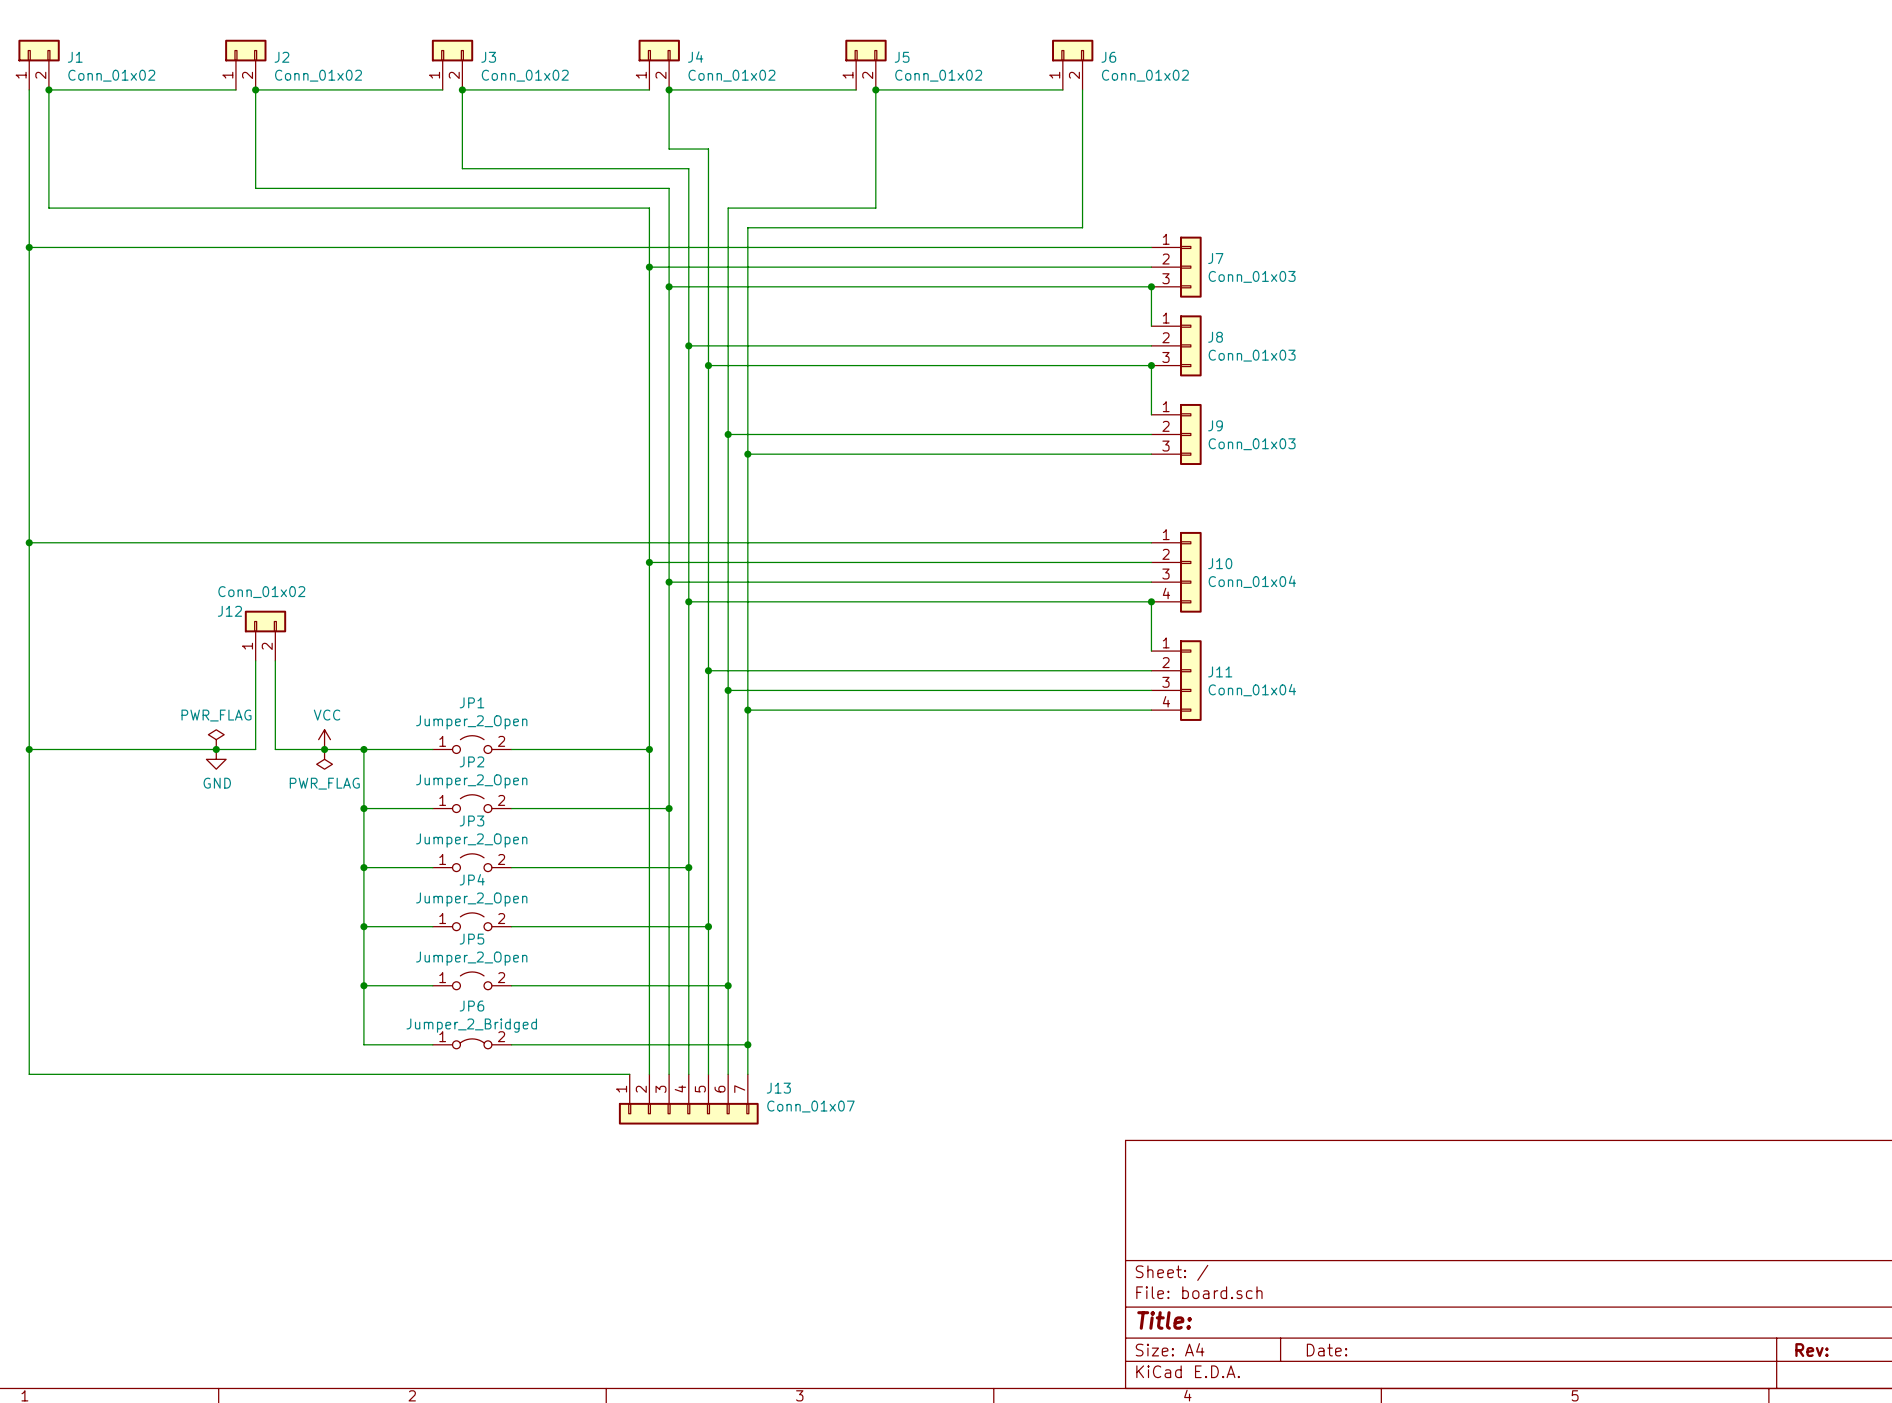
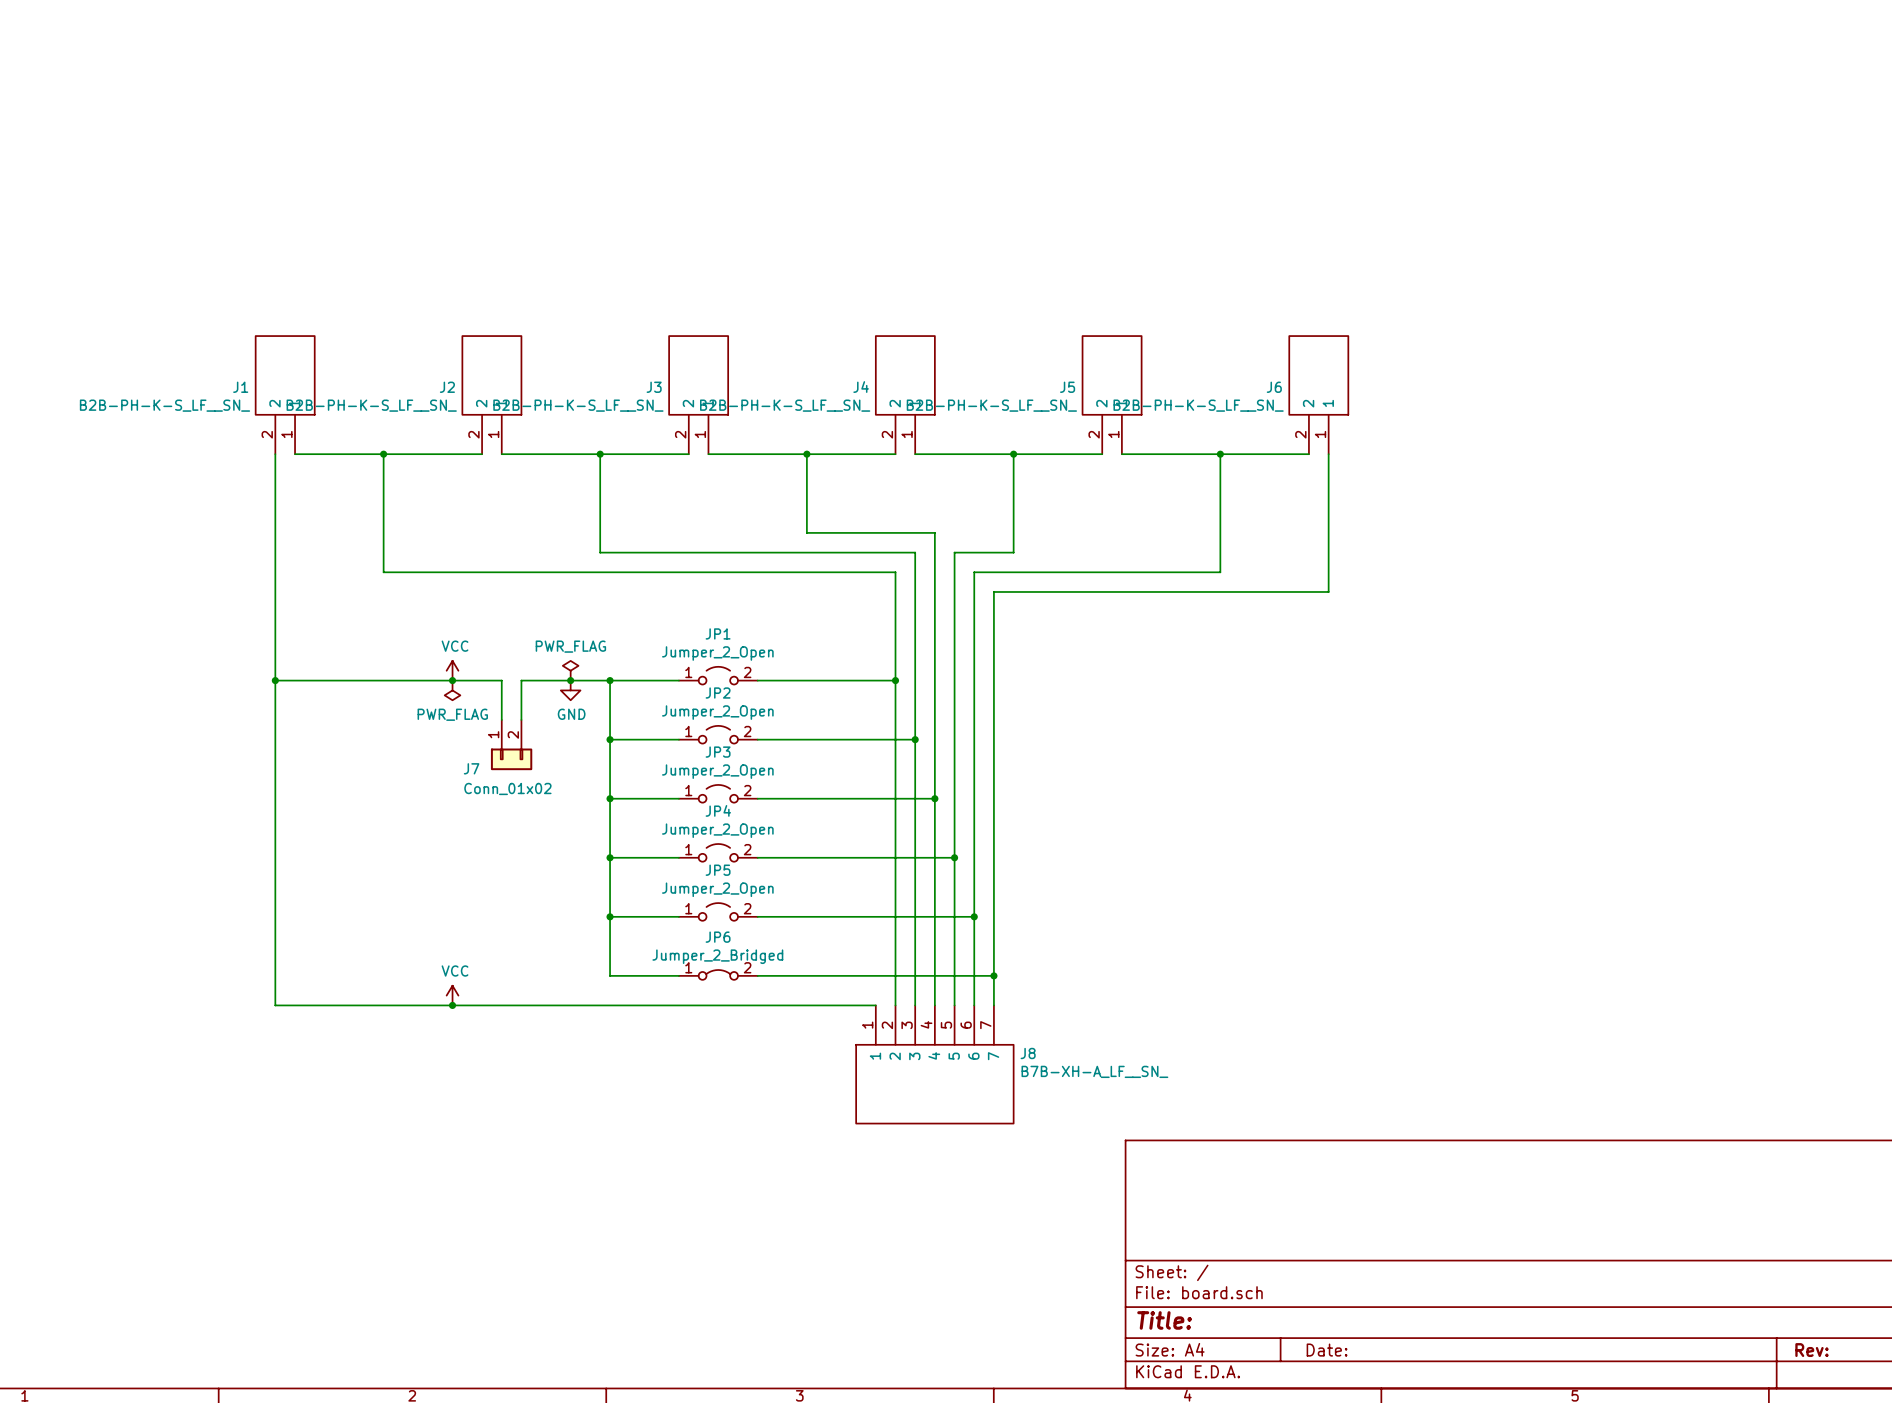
J1 symbol: [18, 39, 60, 90] -> [255, 335, 316, 455]
J2 symbol: [225, 39, 267, 90] -> [461, 335, 523, 455]
J3 symbol: [431, 39, 474, 90] -> [668, 335, 729, 455]
J4 symbol: [638, 39, 680, 90] -> [875, 335, 936, 455]
J5 symbol: [845, 39, 887, 90] -> [1081, 335, 1143, 455]
J6 symbol: [1052, 39, 1094, 90] -> [1288, 335, 1349, 455]
J1 name position: J1 (75, 57) -> J1 (240, 387)
J2 name position: J2 (281, 57) -> J2 (447, 387)
J3 name position: J3 (488, 57) -> J3 (654, 387)
J4 name position: J4 (695, 57) -> J4 (861, 387)
J5 name position: J5 (902, 57) -> J5 (1067, 387)
J6 name position: J6 (1108, 57) -> J6 (1274, 387)
J1 value: Conn_01x02 (111, 75) -> B2B-PH-K-S_LF__SN_ (164, 405)
J2 value: Conn_01x02 (318, 75) -> B2B-PH-K-S_LF__SN_ (371, 405)
J3 value: Conn_01x02 (525, 75) -> B2B-PH-K-S_LF__SN_ (578, 405)
J4 value: Conn_01x02 (731, 75) -> B2B-PH-K-S_LF__SN_ (785, 405)
J5 value: Conn_01x02 (938, 75) -> B2B-PH-K-S_LF__SN_ (991, 405)
J6 value: Conn_01x02 (1145, 75) -> B2B-PH-K-S_LF__SN_ (1198, 405)
wire: (29, 89) (29, 1074) (629, 1074) -> none
junction: (48, 89) -> none
wire: (235, 89) (48, 89) (48, 208) (649, 208) (649, 1074) -> none
junction: (255, 89) -> none
wire: (442, 89) (255, 89) (255, 188) (669, 188) (669, 1074) -> none
junction: (462, 89) -> none
wire: (649, 89) (462, 89) (462, 168) (688, 168) (688, 1074) -> none
junction: (669, 89) -> none
wire: (856, 89) (669, 89) (669, 149) (708, 149) (708, 1074) -> none
junction: (875, 89) -> none
wire: (1062, 89) (875, 89) (875, 208) (728, 208) (728, 1074) -> none
wire: (1082, 89) (1082, 227) (747, 227) (747, 1074) -> none
J7 symbol: [1151, 236, 1202, 298] -> [490, 719, 533, 771]
wire: (29, 247) (1151, 247) -> none
junction: (29, 247) -> none
J7 name position: J7 (1215, 258) -> J7 (471, 768)
wire: (649, 267) (1151, 267) -> none
junction: (649, 267) -> none
J7 value: Conn_01x03 (1252, 276) -> Conn_01x02 (507, 788)
wire: (669, 286) (1151, 286) (1151, 326) -> none
junction: (669, 286) -> none
junction: (1151, 286) -> none
J8 symbol: [1151, 315, 1202, 377] -> [855, 1005, 1015, 1125]
J8 name position: J8 (1215, 337) -> J8 (1028, 1053)
wire: (688, 345) (1151, 345) -> none
junction: (688, 345) -> none
J8 value: Conn_01x03 (1252, 355) -> B7B-XH-A_LF__SN_ (1094, 1071)
wire: (708, 365) (1151, 365) (1151, 414) -> none
junction: (708, 365) -> none
junction: (1151, 365) -> none
wire: (728, 434) (1151, 434) -> none
junction: (728, 434) -> none
J9: Conn_01x03 (1176, 434) -> none
wire: none -> (275, 454) (275, 660)
wire: none -> (295, 454) (482, 454)
wire: none -> (383, 454) (383, 572) (895, 572) (895, 1005)
junction: none -> (383, 454)
wire: none -> (501, 454) (688, 454)
wire: none -> (600, 454) (600, 552) (915, 552) (915, 1005)
junction: none -> (600, 454)
wire: none -> (708, 454) (747, 454)
junction: (747, 454) -> none
wire: none -> (806, 454) (806, 532) (934, 532) (934, 1005)
junction: none -> (806, 454)
wire: (895, 454) (915, 454) -> none
wire: none -> (1013, 454) (1013, 552) (954, 552) (954, 1005)
junction: none -> (1013, 454)
wire: (1102, 454) (1121, 454) -> none
wire: none -> (1151, 454) (1308, 454)
wire: none -> (1220, 454) (1220, 572) (974, 572) (974, 1005)
junction: none -> (1220, 454)
wire: none -> (1328, 454) (1328, 591) (993, 591) (993, 1005)
wire: (29, 542) (1151, 542) -> none
junction: (29, 542) -> none
wire: (649, 562) (1151, 562) -> none
junction: (649, 562) -> none
J10: Conn_01x04 (1176, 572) -> none
wire: (669, 582) (1151, 582) -> none
junction: (669, 582) -> none
wire: (688, 601) (1151, 601) (1151, 651) -> none
junction: (688, 601) -> none
junction: (1151, 601) -> none
J12: Conn_01x02 (265, 635) -> none
wire: (255, 660) (255, 749) (29, 749) -> none
power symbol: none -> VCC (452, 670)
power symbol: none -> PWR_FLAG (570, 670)
wire: (708, 670) (1151, 670) -> none
junction: (708, 670) -> none
wire: none -> (275, 680) (501, 680) (501, 719)
junction: none -> (275, 680)
junction: none -> (452, 680)
junction: none -> (570, 680)
wire: none -> (610, 680) (610, 975) (678, 975)
junction: none -> (610, 680)
wire: none -> (678, 680) (521, 680) (521, 719)
wire: none -> (757, 680) (895, 680)
junction: none -> (895, 680)
J11: Conn_01x04 (1176, 680) -> none
power symbol: none -> PWR_FLAG (452, 690)
power symbol: none -> GND (570, 690)
wire: (728, 690) (1151, 690) -> none
junction: (728, 690) -> none
wire: (747, 710) (1151, 710) -> none
junction: (747, 710) -> none
power symbol: PWR_FLAG (216, 739) -> none
power symbol: VCC (324, 739) -> none
wire: none -> (610, 739) (678, 739)
junction: none -> (610, 739)
wire: none -> (757, 739) (915, 739)
junction: none -> (915, 739)
JP1 position: (472, 744) -> (718, 675)
junction: (29, 749) -> none
junction: (216, 749) -> none
wire: (275, 749) (432, 749) -> (275, 749) (275, 1005) (875, 1005)
junction: (324, 749) -> none
wire: (363, 749) (363, 1044) (432, 1044) -> none
junction: (363, 749) -> none
wire: (511, 749) (649, 749) -> none
junction: (649, 749) -> none
power symbol: GND (216, 759) -> none
power symbol: PWR_FLAG (324, 759) -> none
wire: none -> (610, 798) (678, 798)
junction: none -> (610, 798)
wire: none -> (757, 798) (934, 798)
junction: none -> (934, 798)
JP2 position: (472, 803) -> (718, 734)
wire: (363, 808) (432, 808) -> none
junction: (363, 808) -> none
wire: (511, 808) (669, 808) -> none
junction: (669, 808) -> none
wire: none -> (610, 857) (678, 857)
junction: none -> (610, 857)
wire: none -> (757, 857) (954, 857)
junction: none -> (954, 857)
JP3 position: (472, 862) -> (718, 793)
wire: (363, 867) (432, 867) -> none
junction: (363, 867) -> none
wire: (511, 867) (688, 867) -> none
junction: (688, 867) -> none
wire: none -> (610, 916) (678, 916)
junction: none -> (610, 916)
wire: none -> (757, 916) (974, 916)
junction: none -> (974, 916)
JP4 position: (472, 921) -> (718, 852)
wire: (363, 926) (432, 926) -> none
junction: (363, 926) -> none
wire: (511, 926) (708, 926) -> none
junction: (708, 926) -> none
wire: none -> (757, 975) (993, 975)
junction: none -> (993, 975)
JP5 position: (472, 980) -> (718, 911)
wire: (363, 985) (432, 985) -> none
junction: (363, 985) -> none
wire: (511, 985) (728, 985) -> none
junction: (728, 985) -> none
power symbol: none -> VCC (452, 995)
junction: none -> (452, 1005)
JP6 position: (472, 1043) -> (718, 974)
wire: (511, 1044) (747, 1044) -> none
junction: (747, 1044) -> none
J13: Conn_01x07 (688, 1099) -> none

